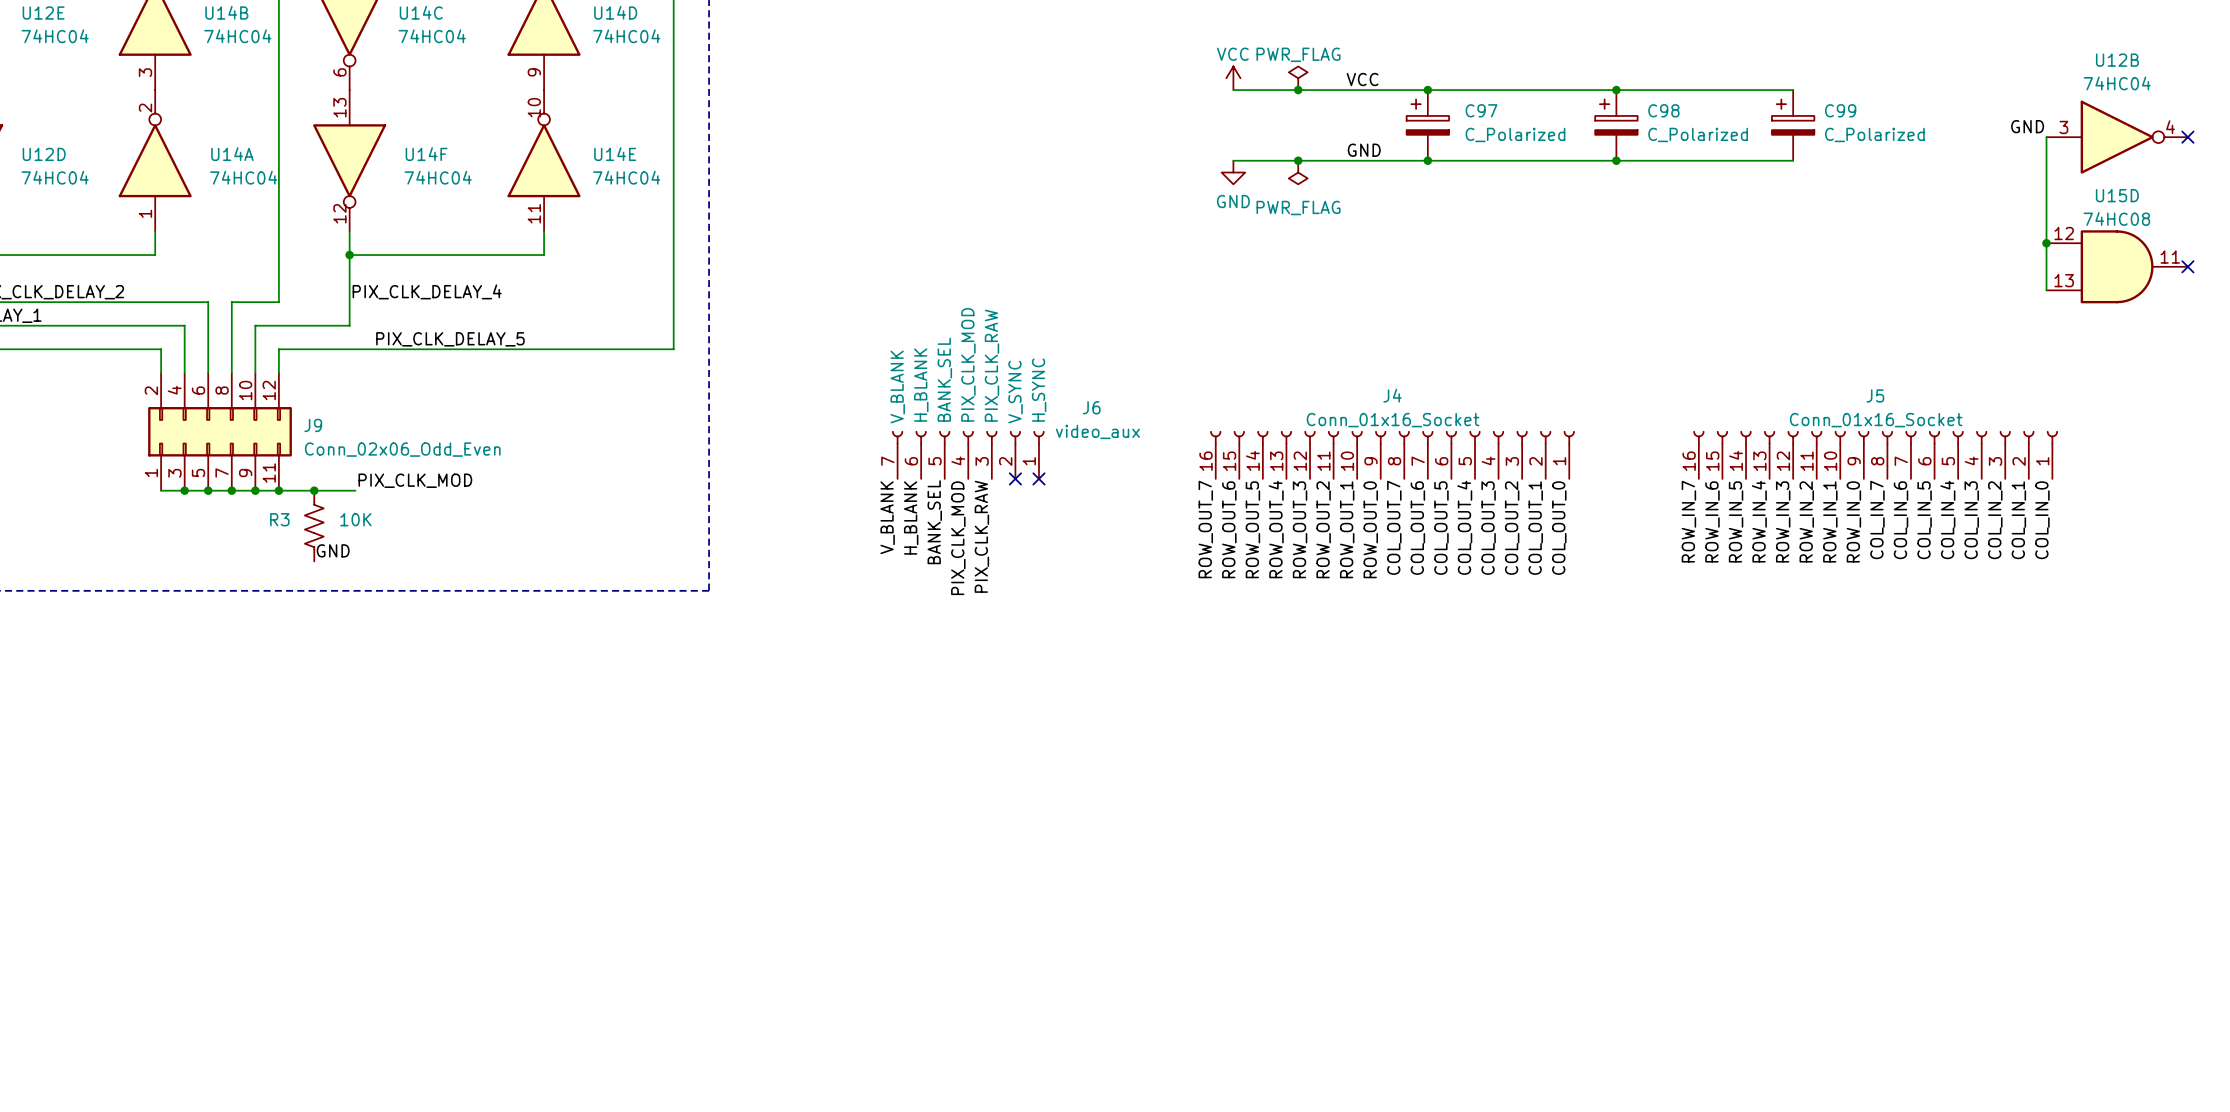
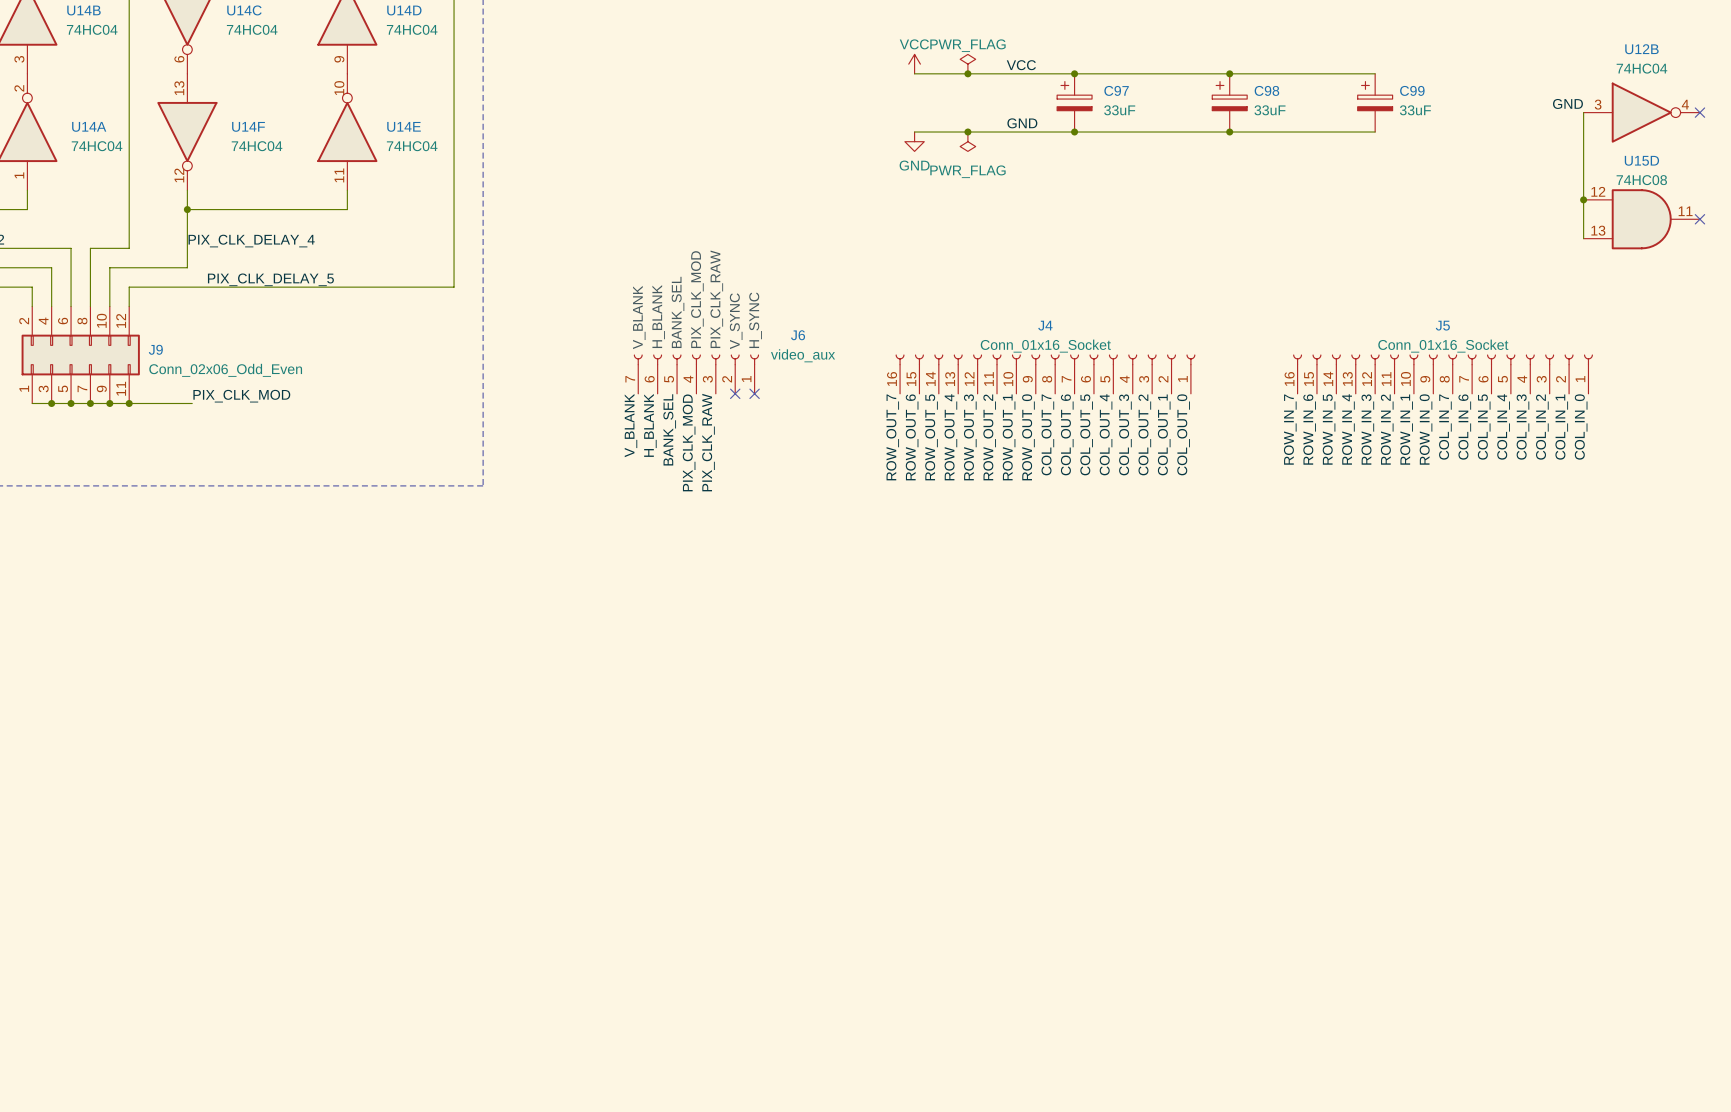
C97 value: C_Polarized (1515, 134) -> 33uF (1119, 110)
C98 value: C_Polarized (1698, 134) -> 33uF (1270, 110)
C99 value: C_Polarized (1874, 134) -> 33uF (1415, 110)
junction: (314, 490) -> none
R3: 10K (314, 526) -> none
label: GND (333, 550) -> none

